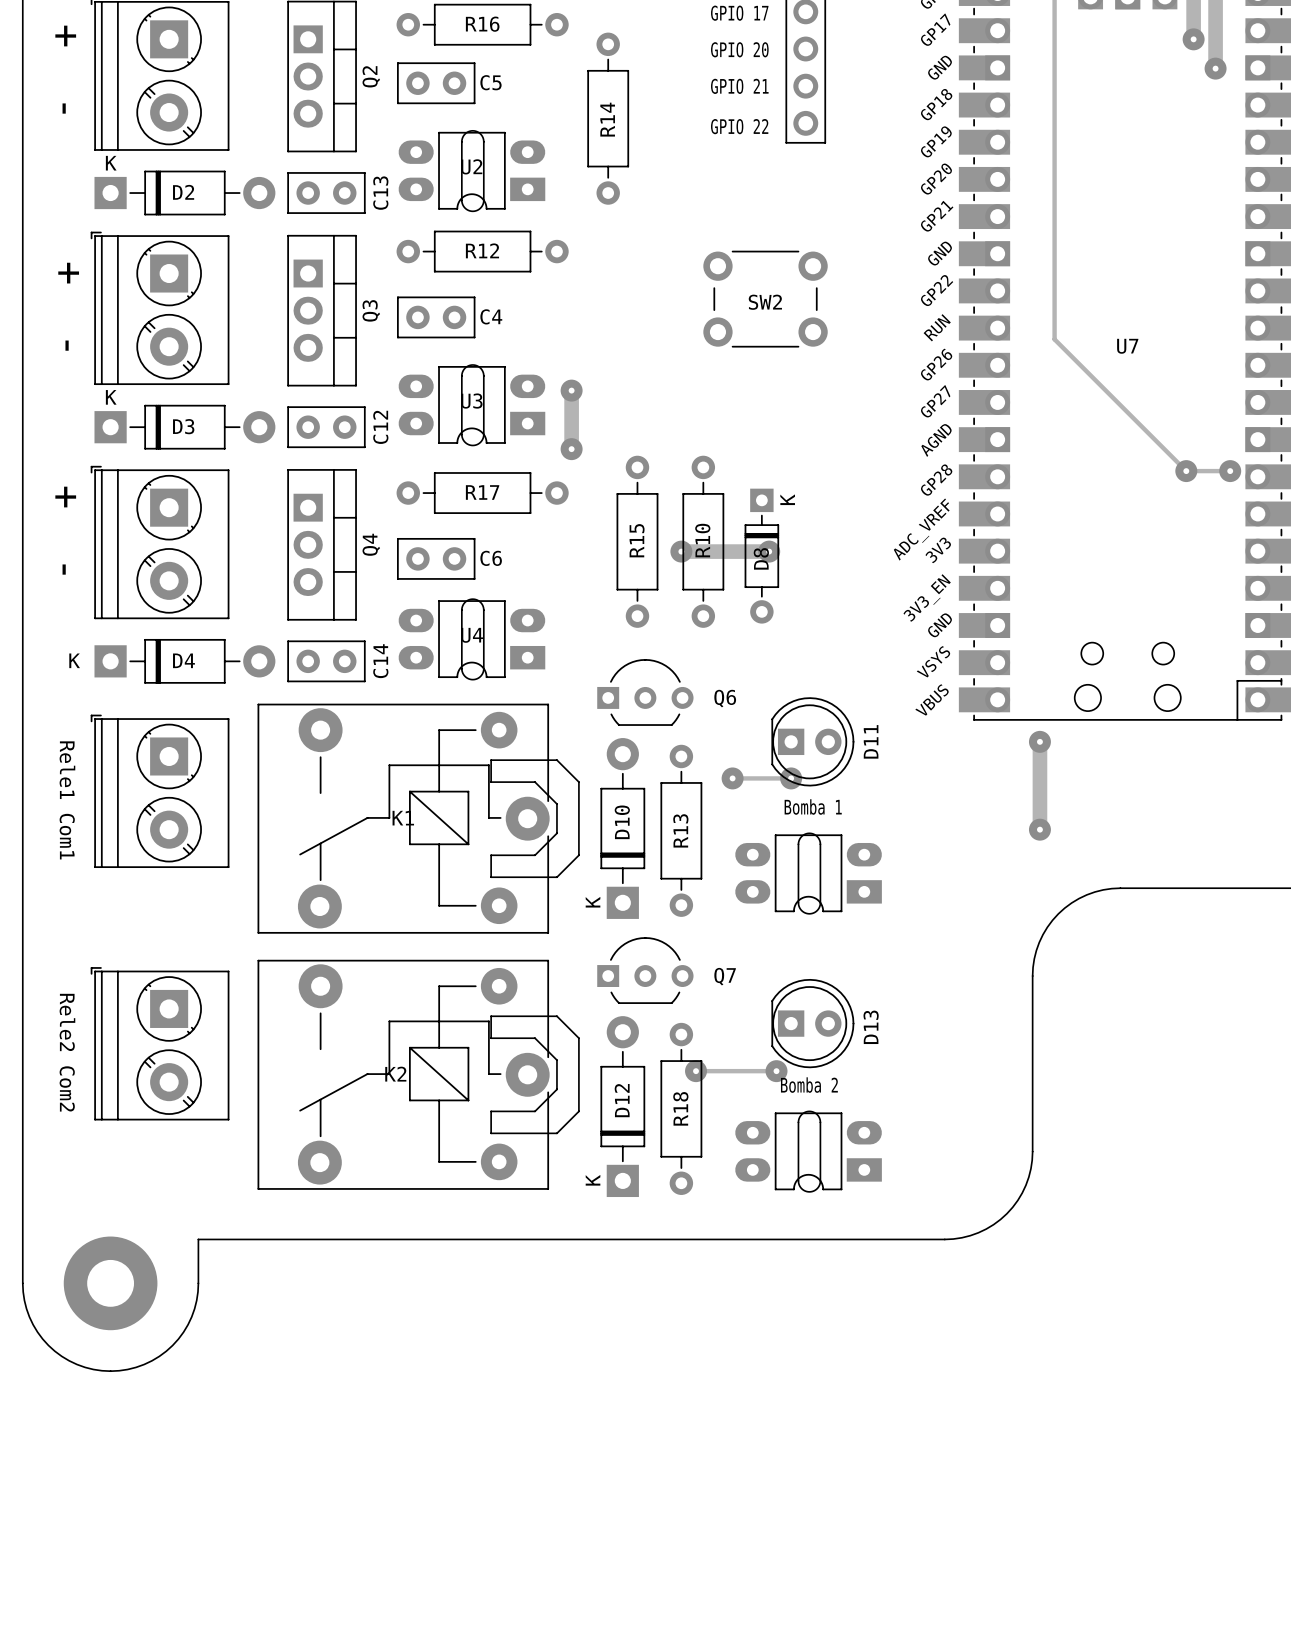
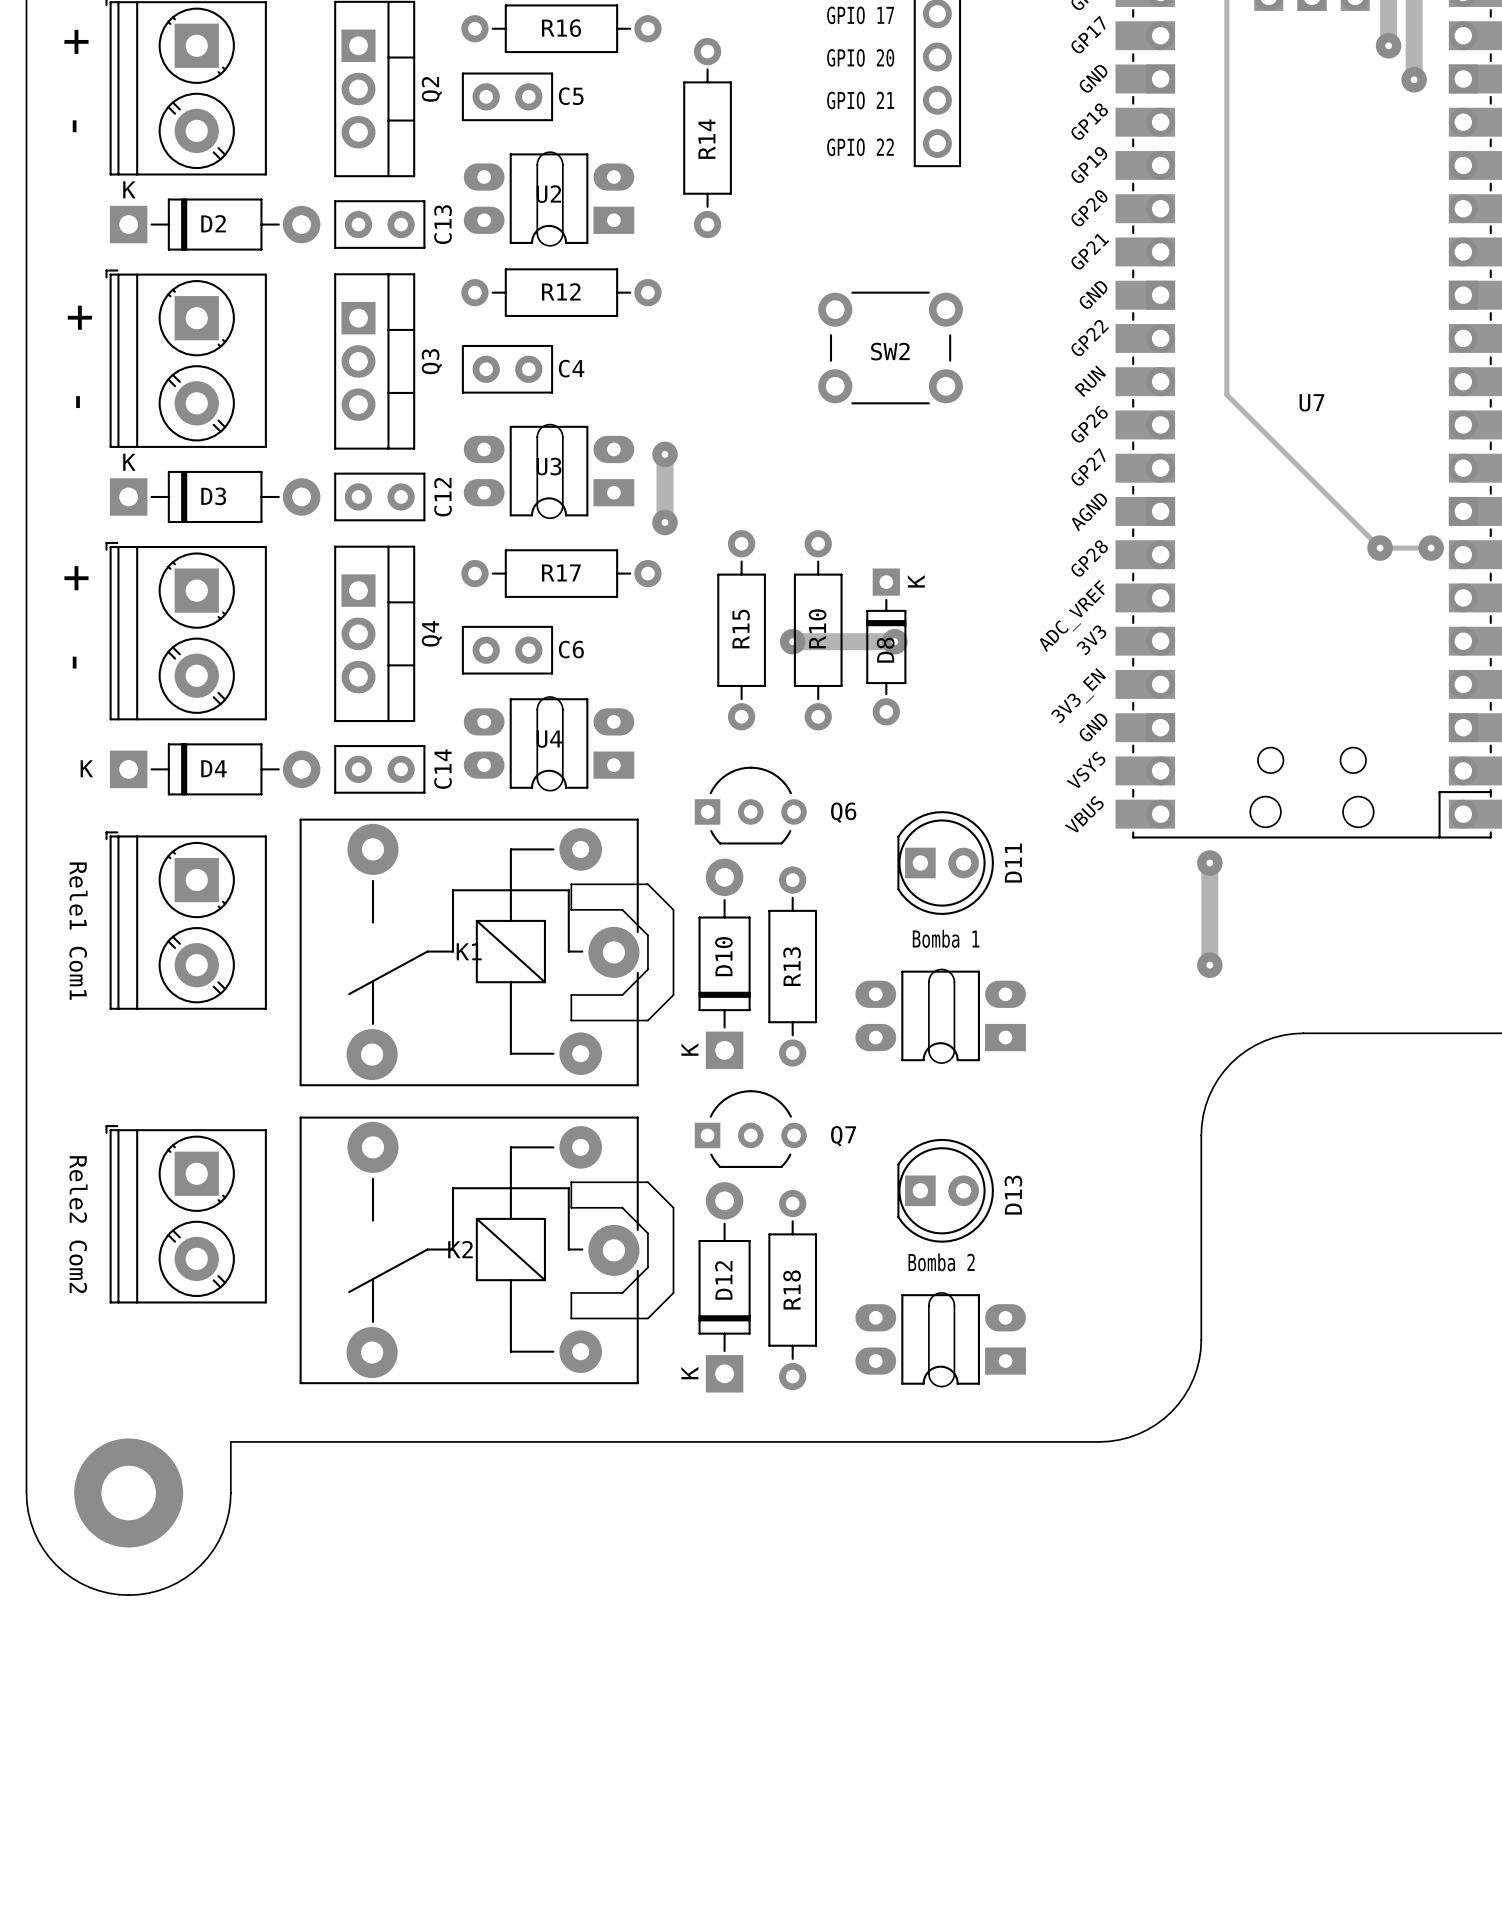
track: (732, 778) (791, 778) -> none
via: (732, 778) -> none
via: (791, 778) -> none
track: (696, 1071) (776, 1071) -> none
via: (696, 1071) -> none
via: (776, 1071) -> none

